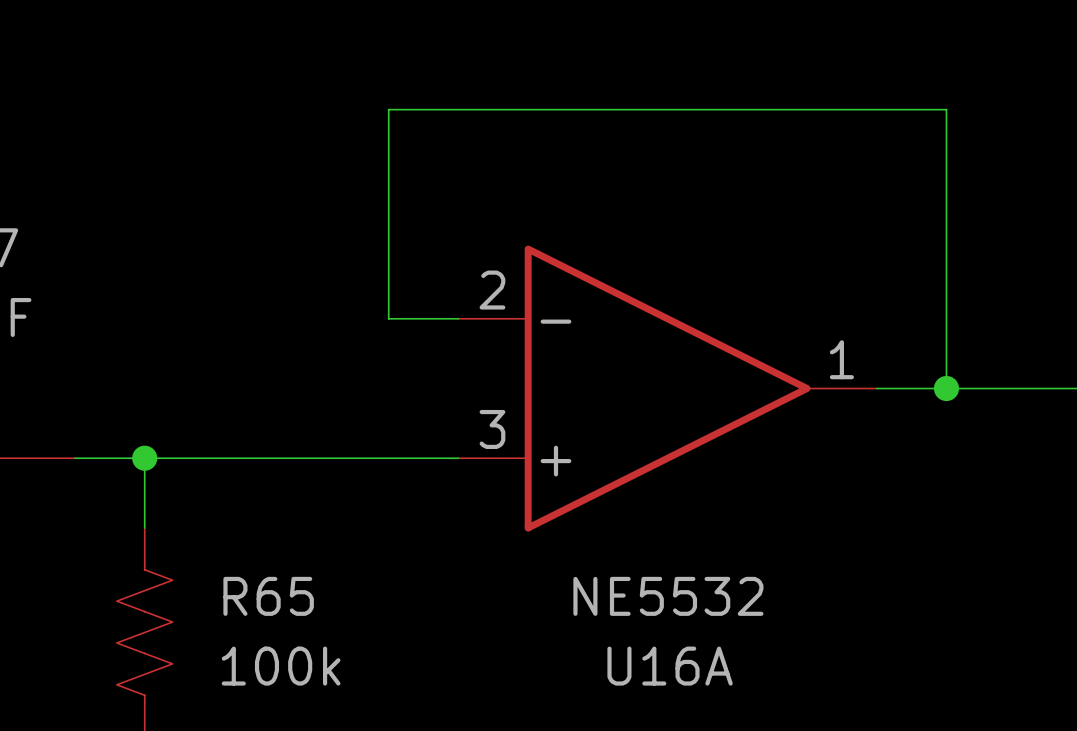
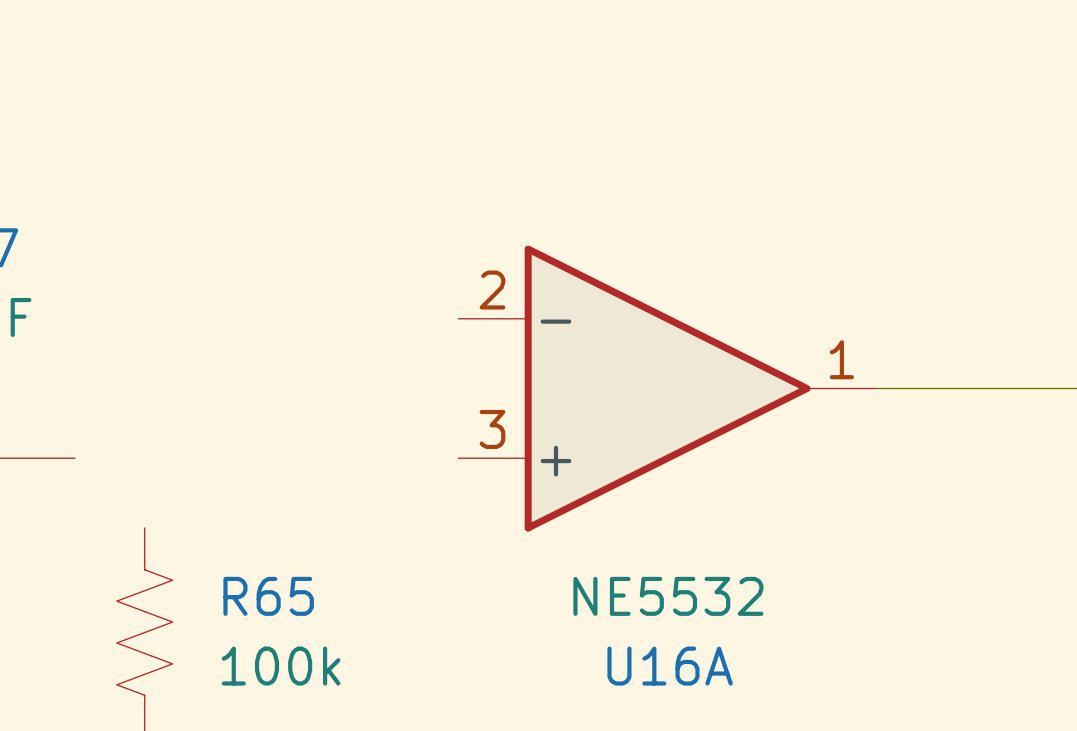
wire: (458, 318) (388, 318) (388, 109) (946, 109) (946, 388) -> none
junction: (946, 388) -> none
wire: (75, 458) (458, 458) -> none
wire: (144, 458) (144, 527) -> none
junction: (144, 458) -> none

